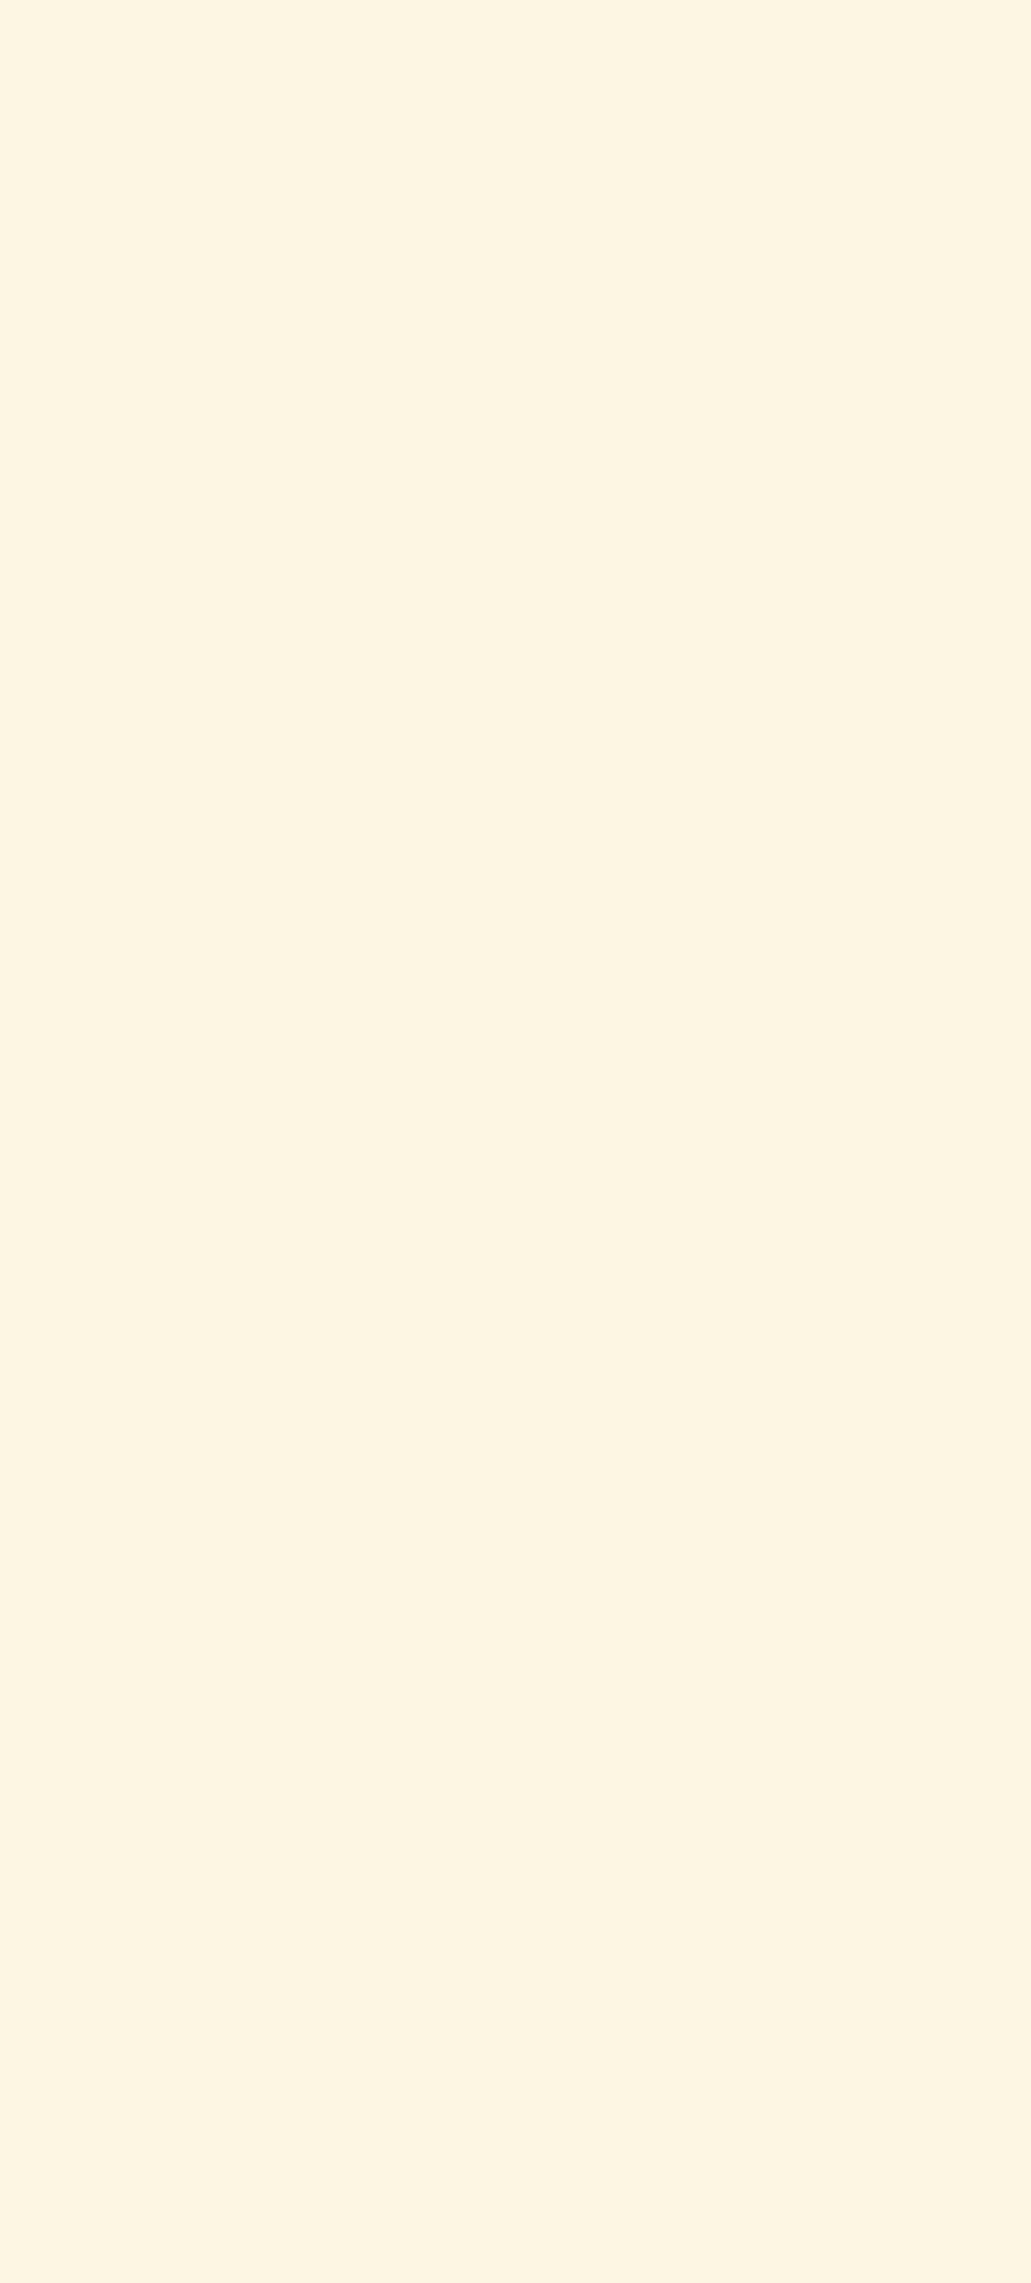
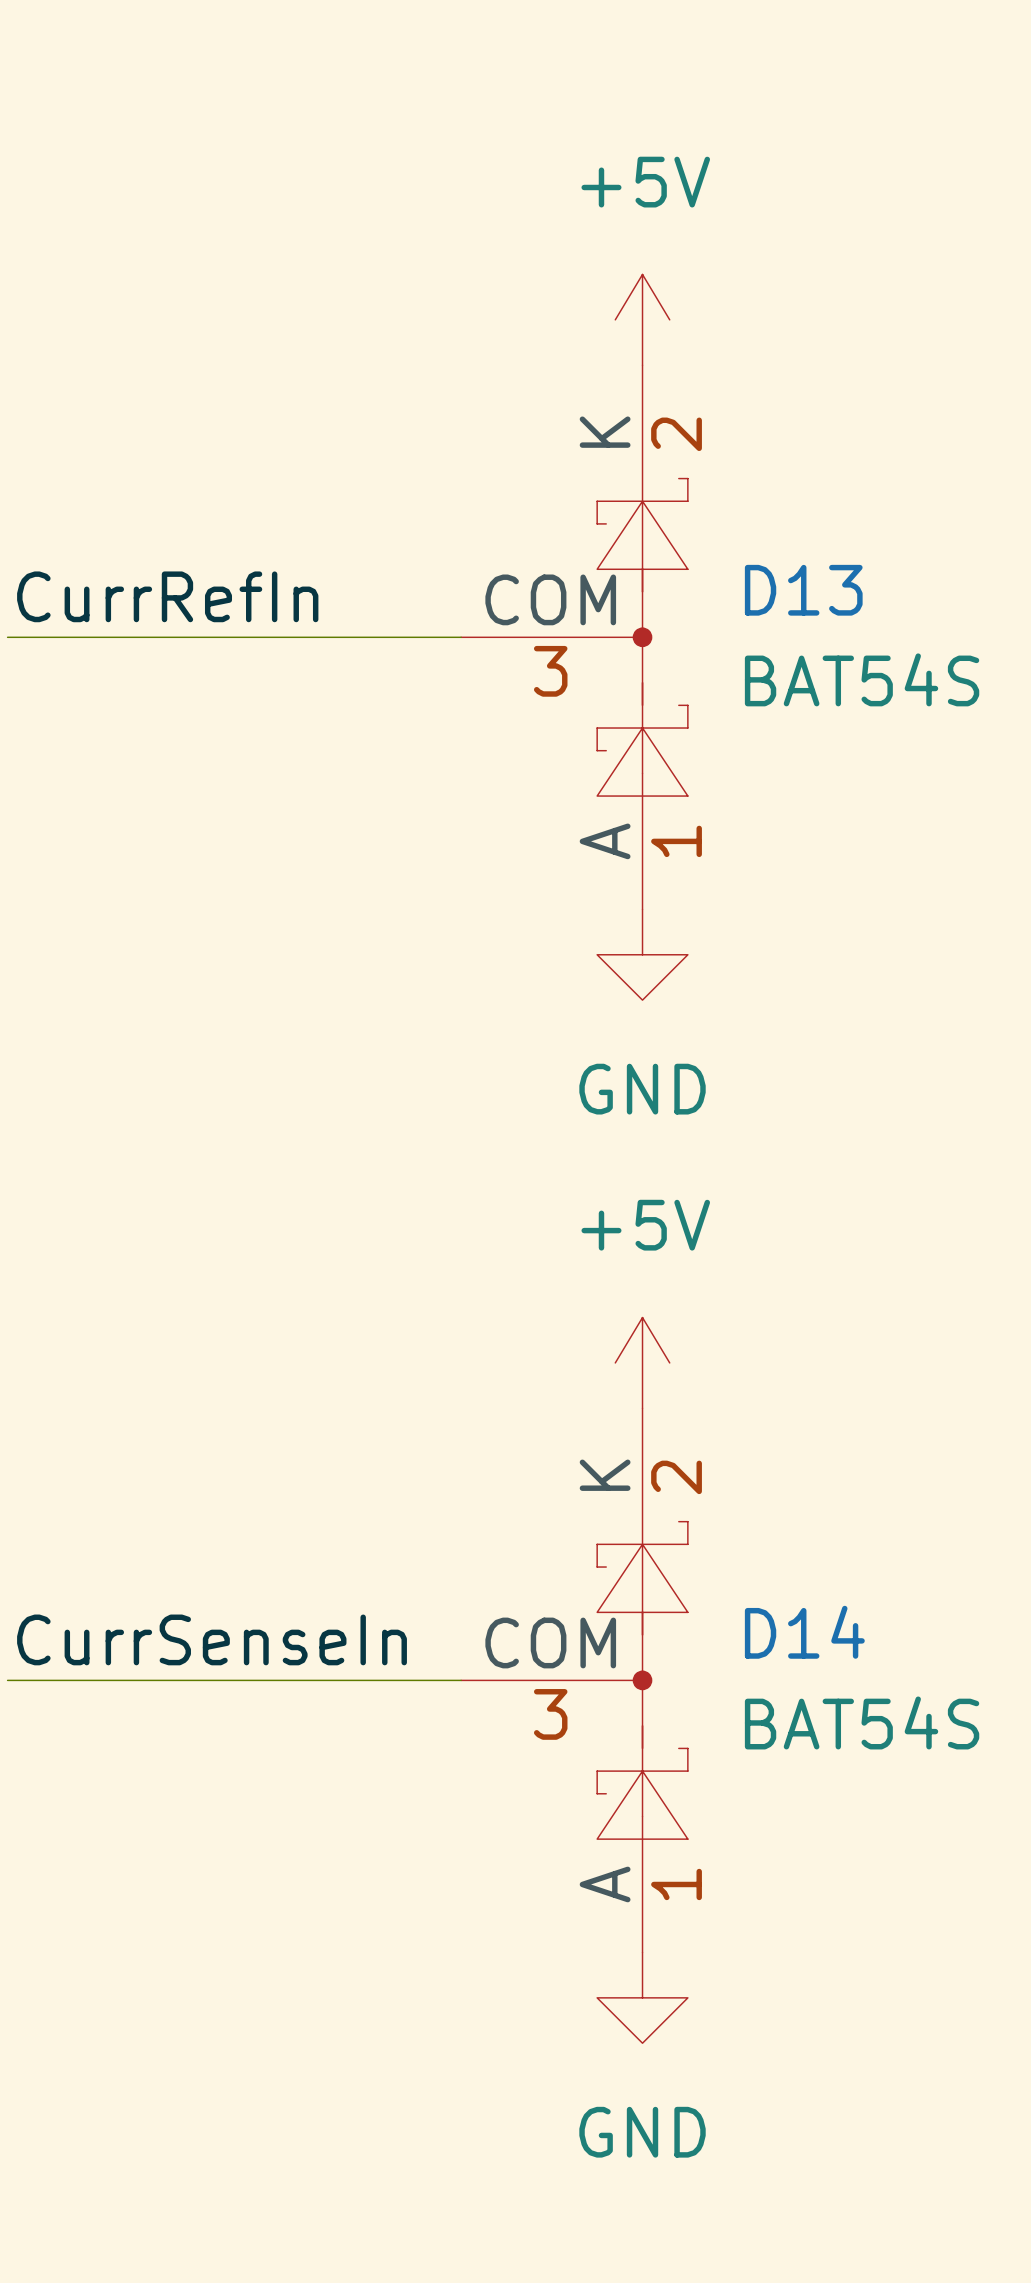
power symbol: none -> +5V (642, 319)
label: none -> CurrRefIn (167, 596)
wire: none -> (7, 637) (461, 637)
D13: none -> BAT54S (574, 637)
power symbol: none -> GND (642, 954)
power symbol: none -> +5V (642, 1362)
label: none -> CurrSenseIn (212, 1639)
wire: none -> (7, 1680) (461, 1680)
D14: none -> BAT54S (574, 1680)
power symbol: none -> GND (642, 1997)

